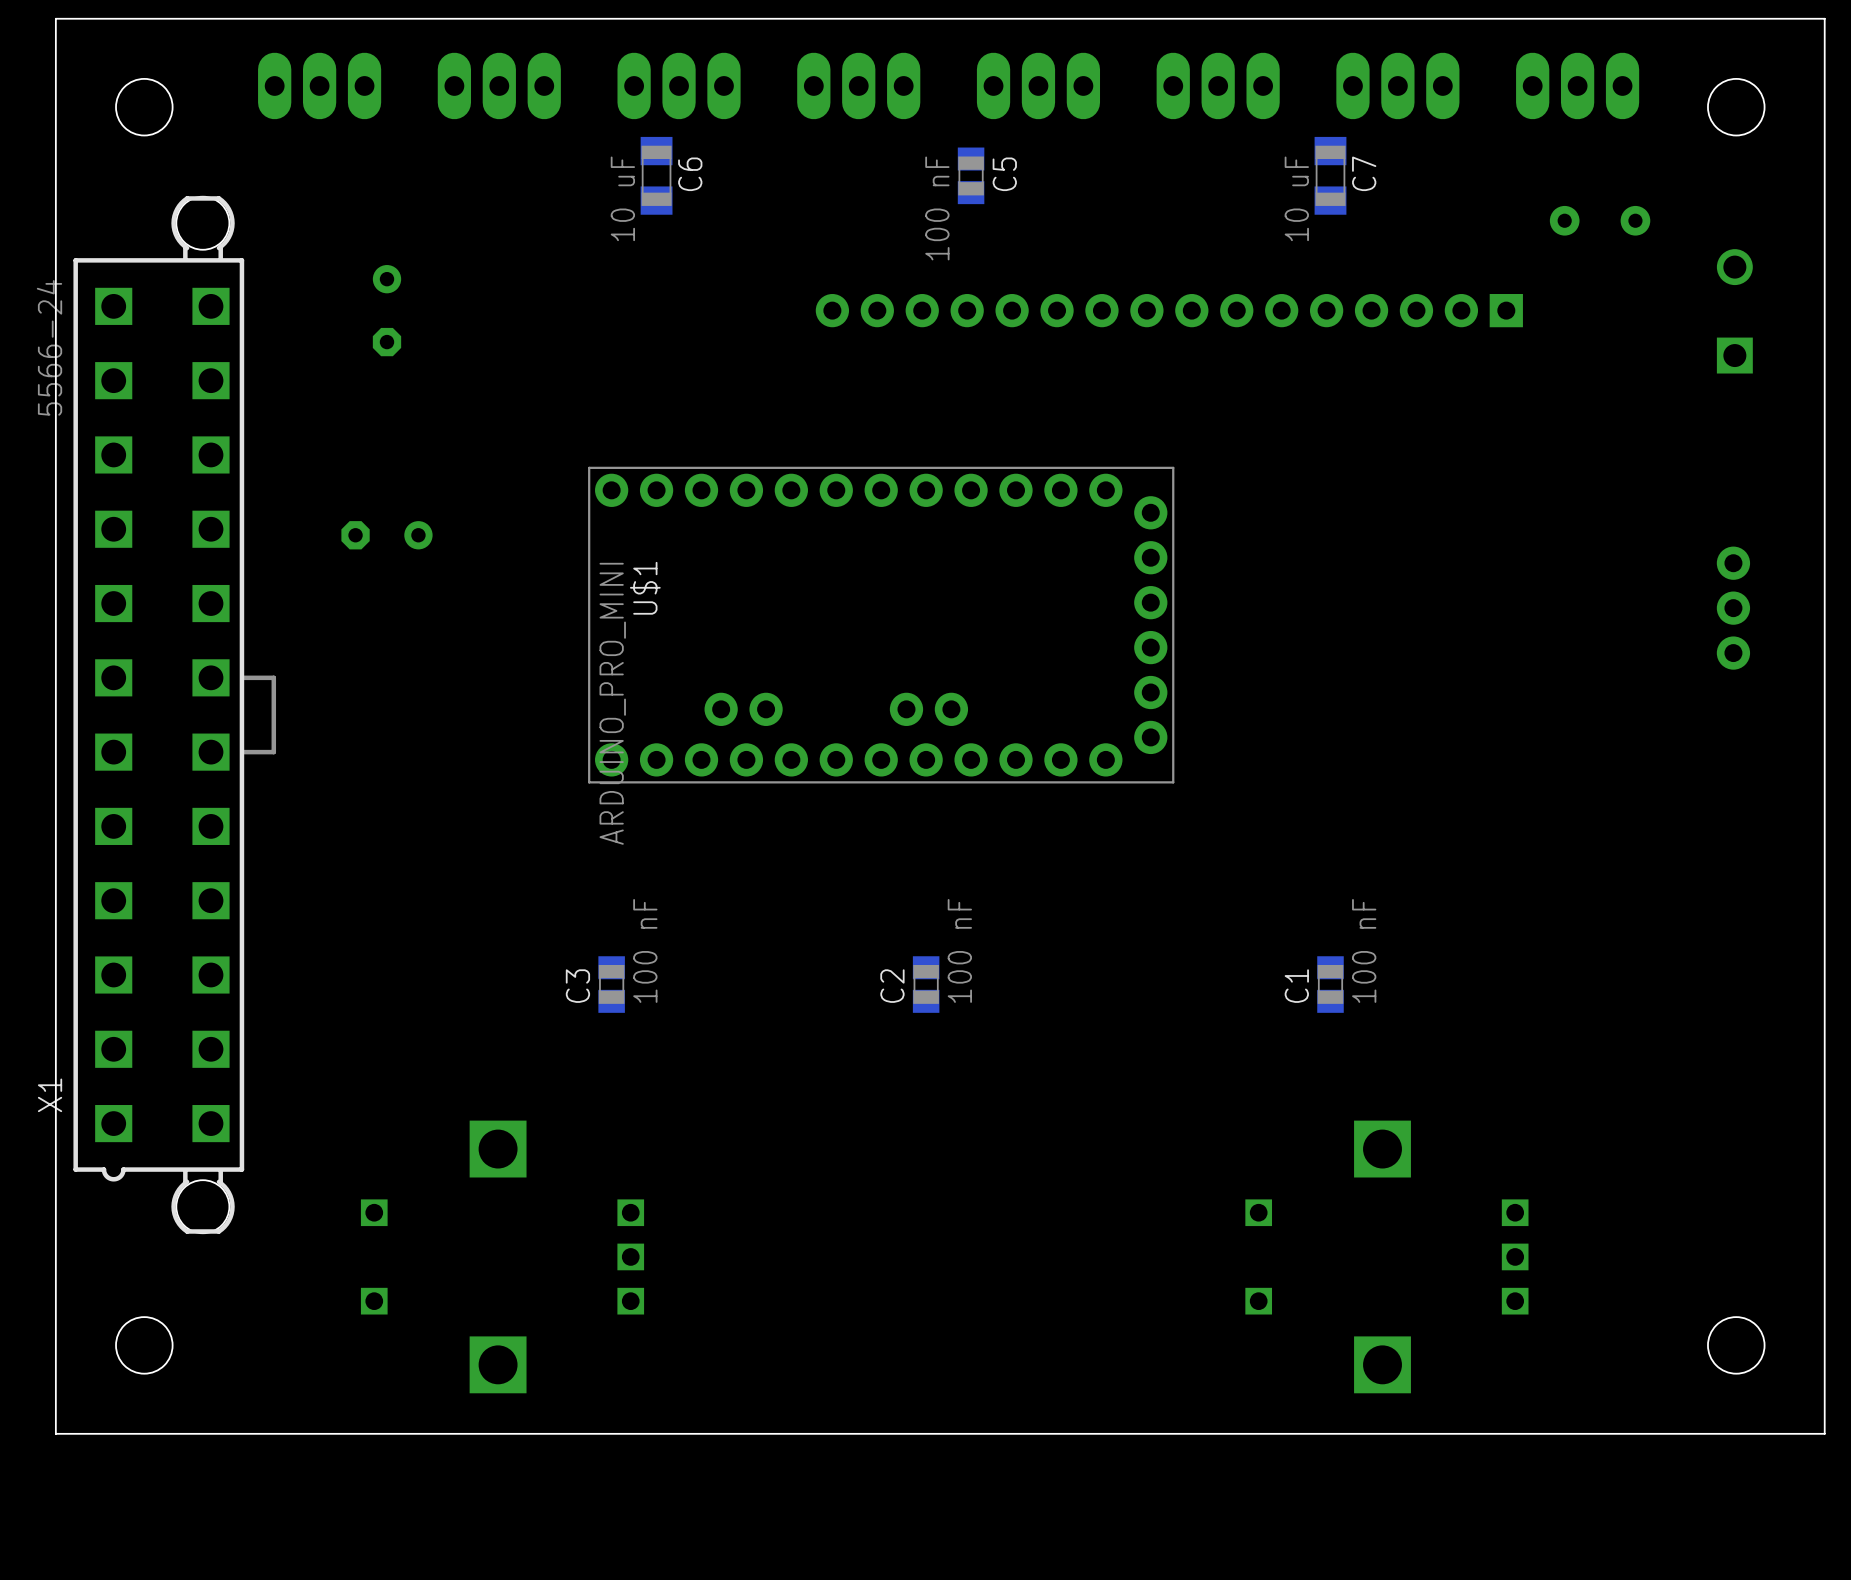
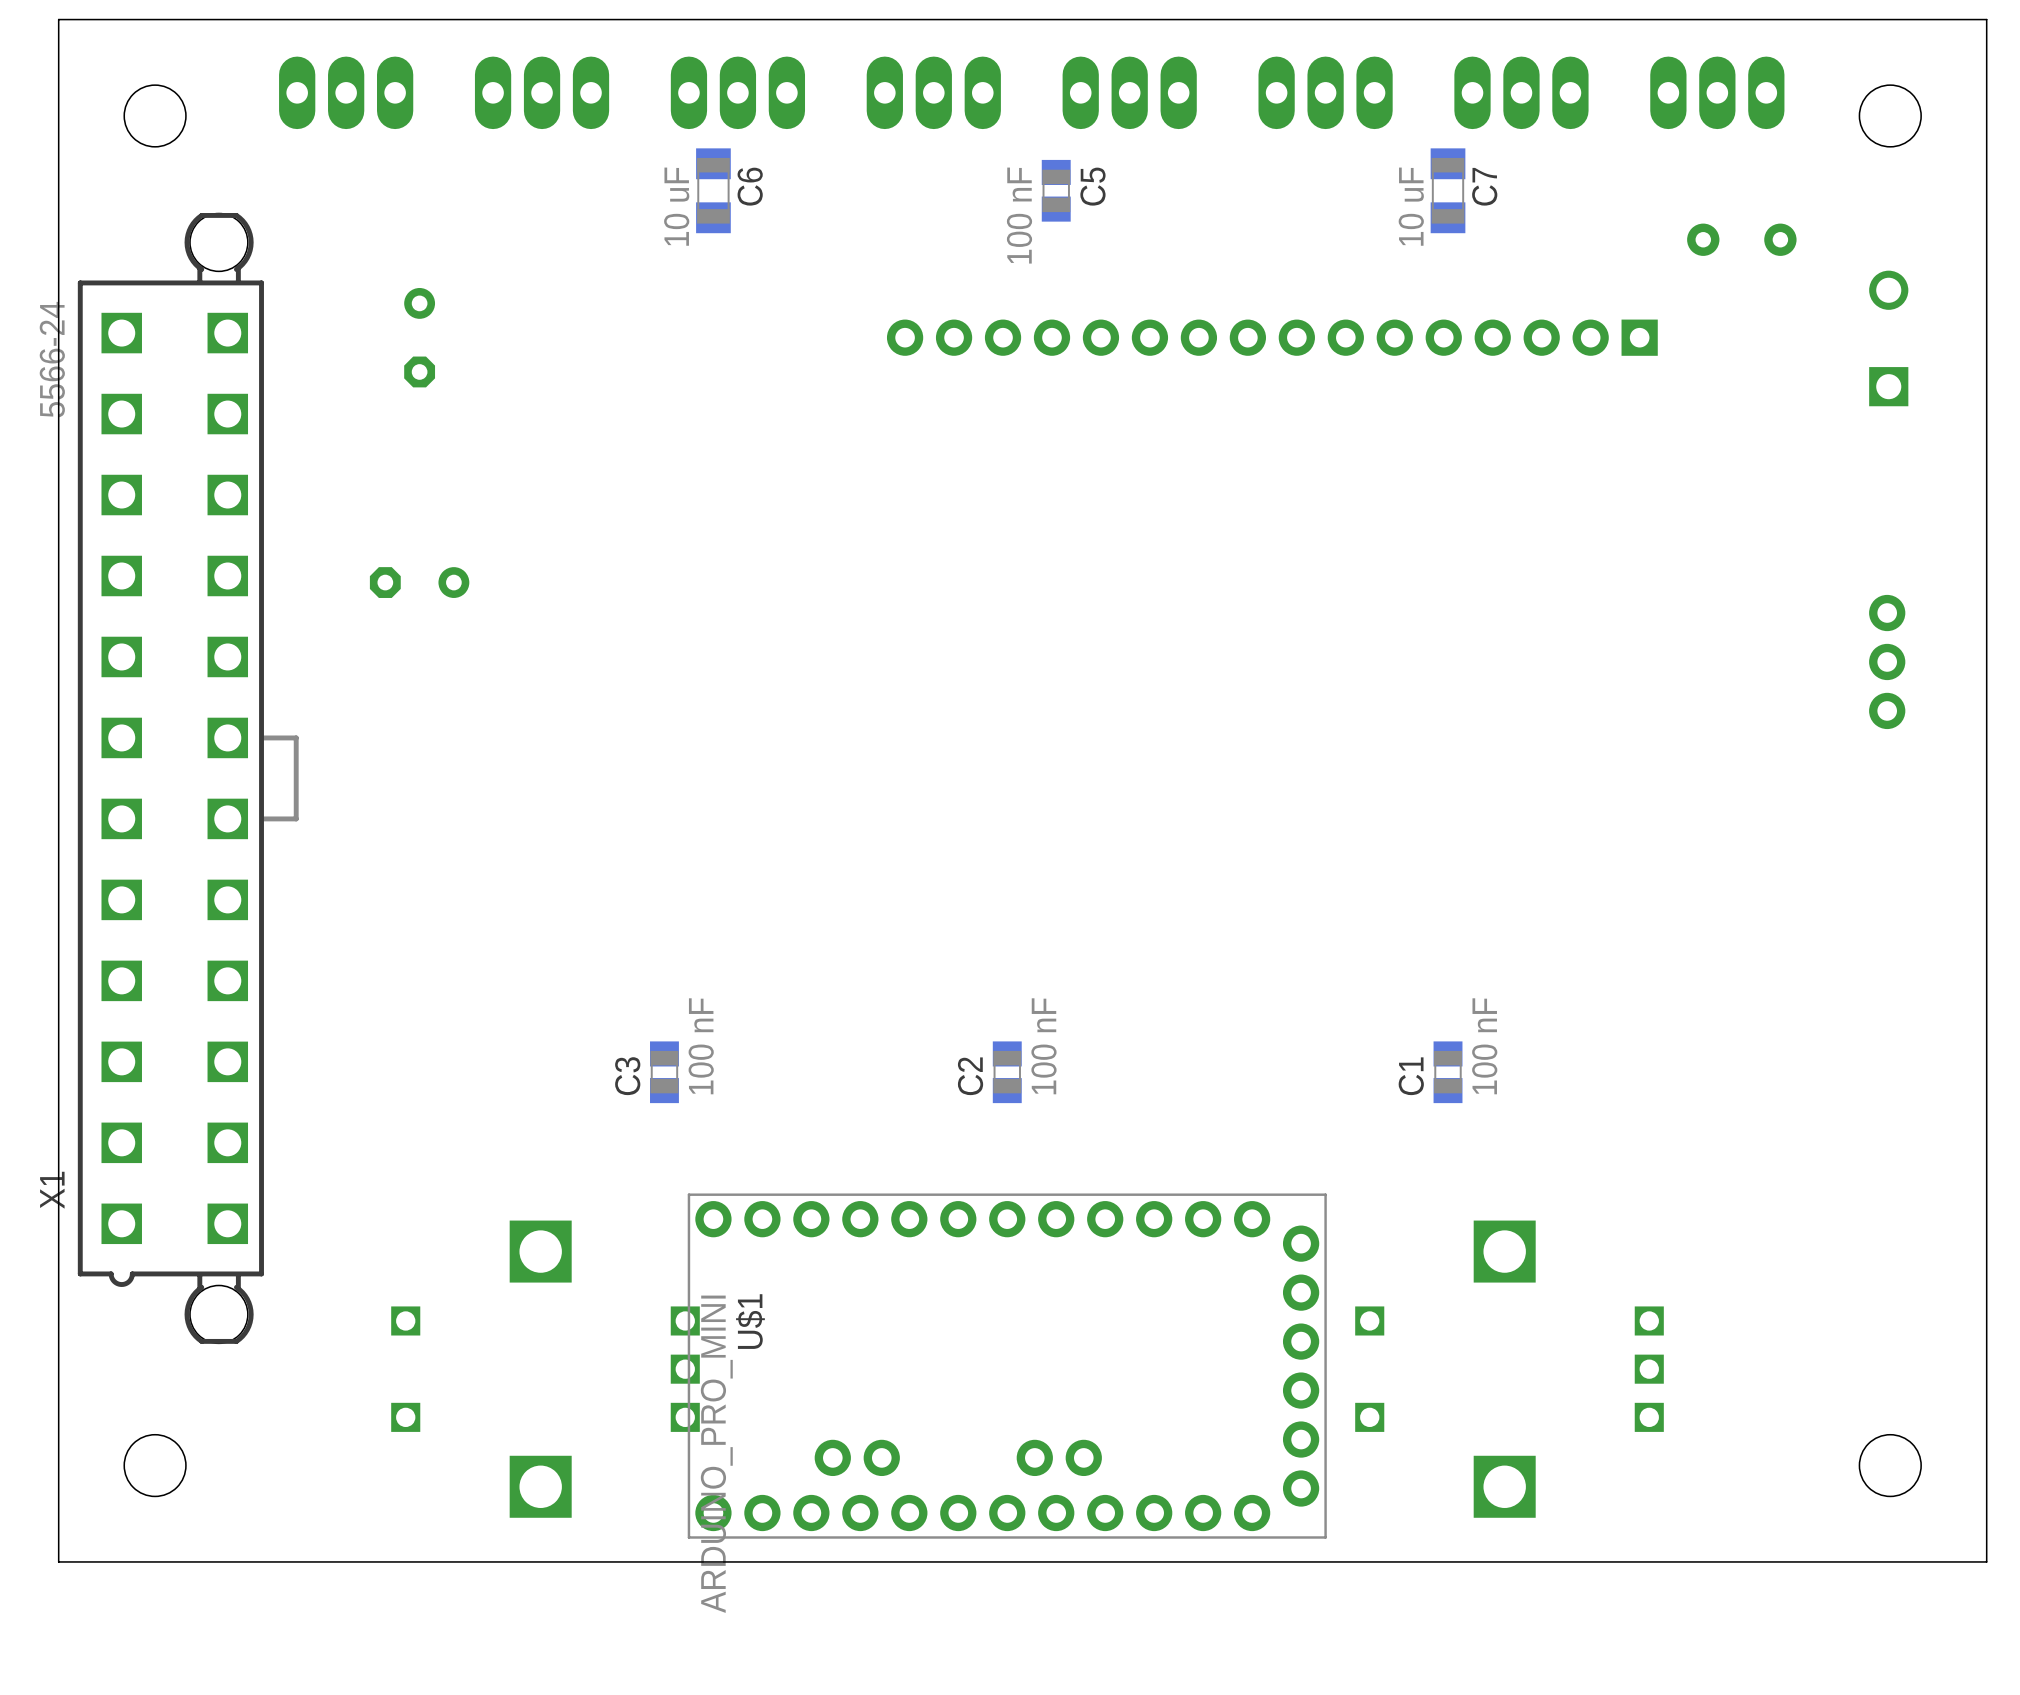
U$1 position: (881, 625) -> (1007, 1366)

